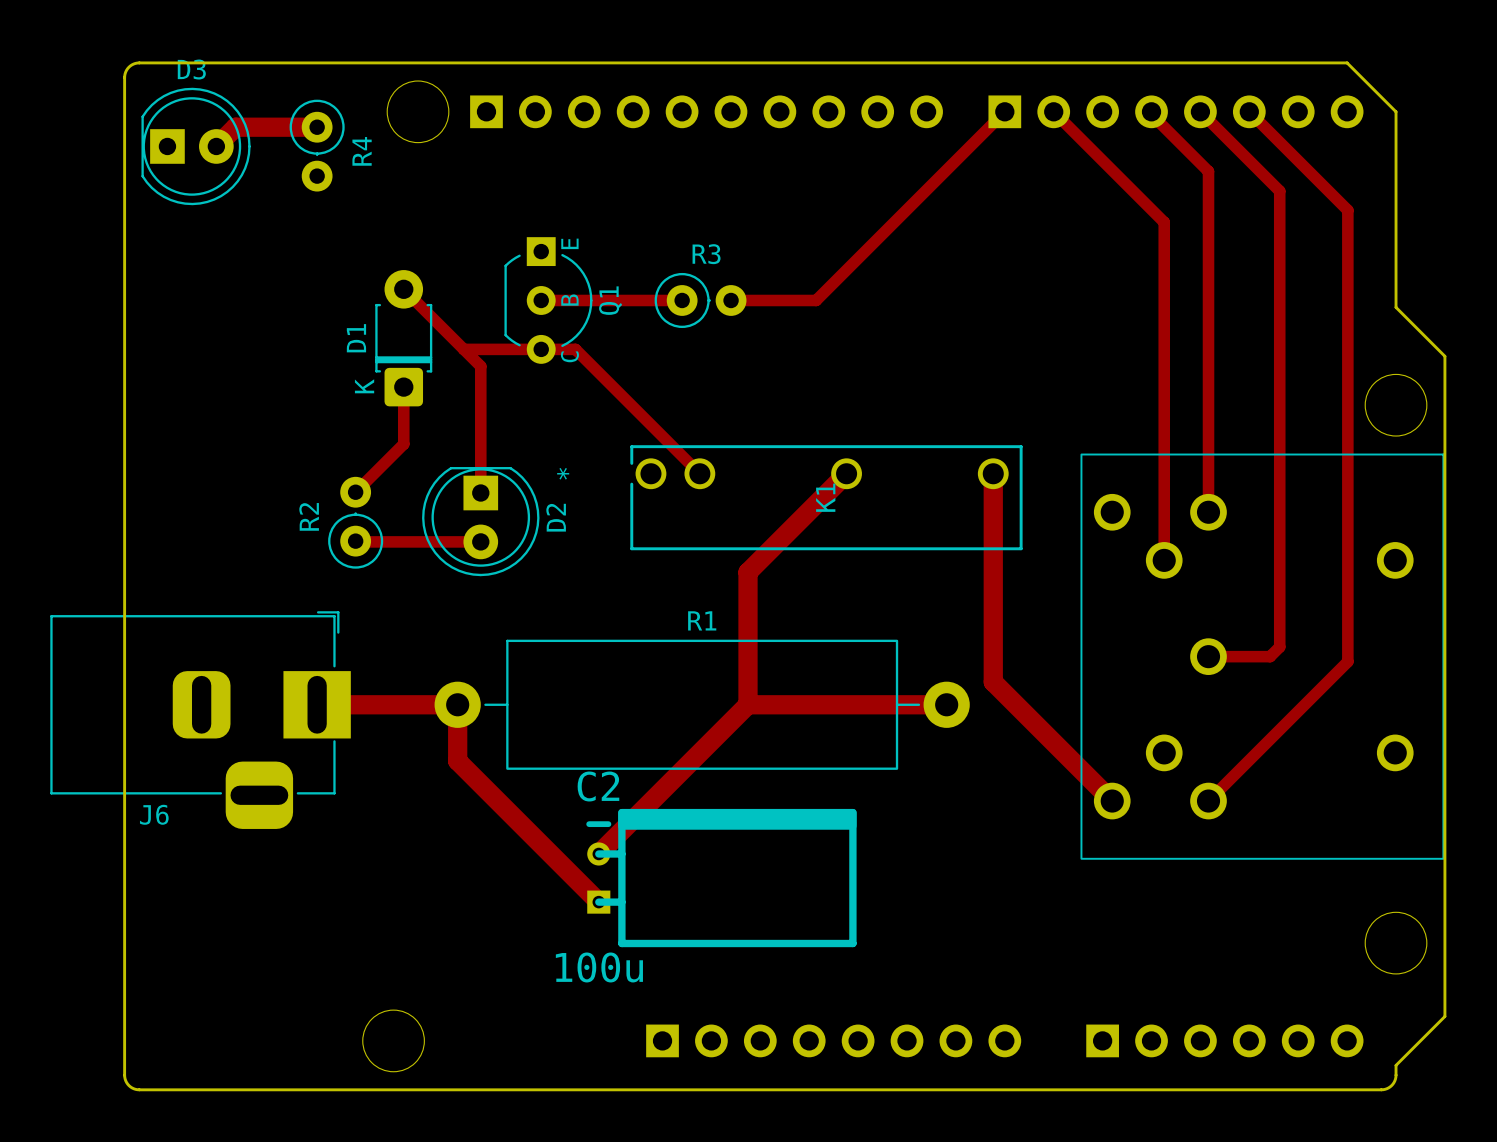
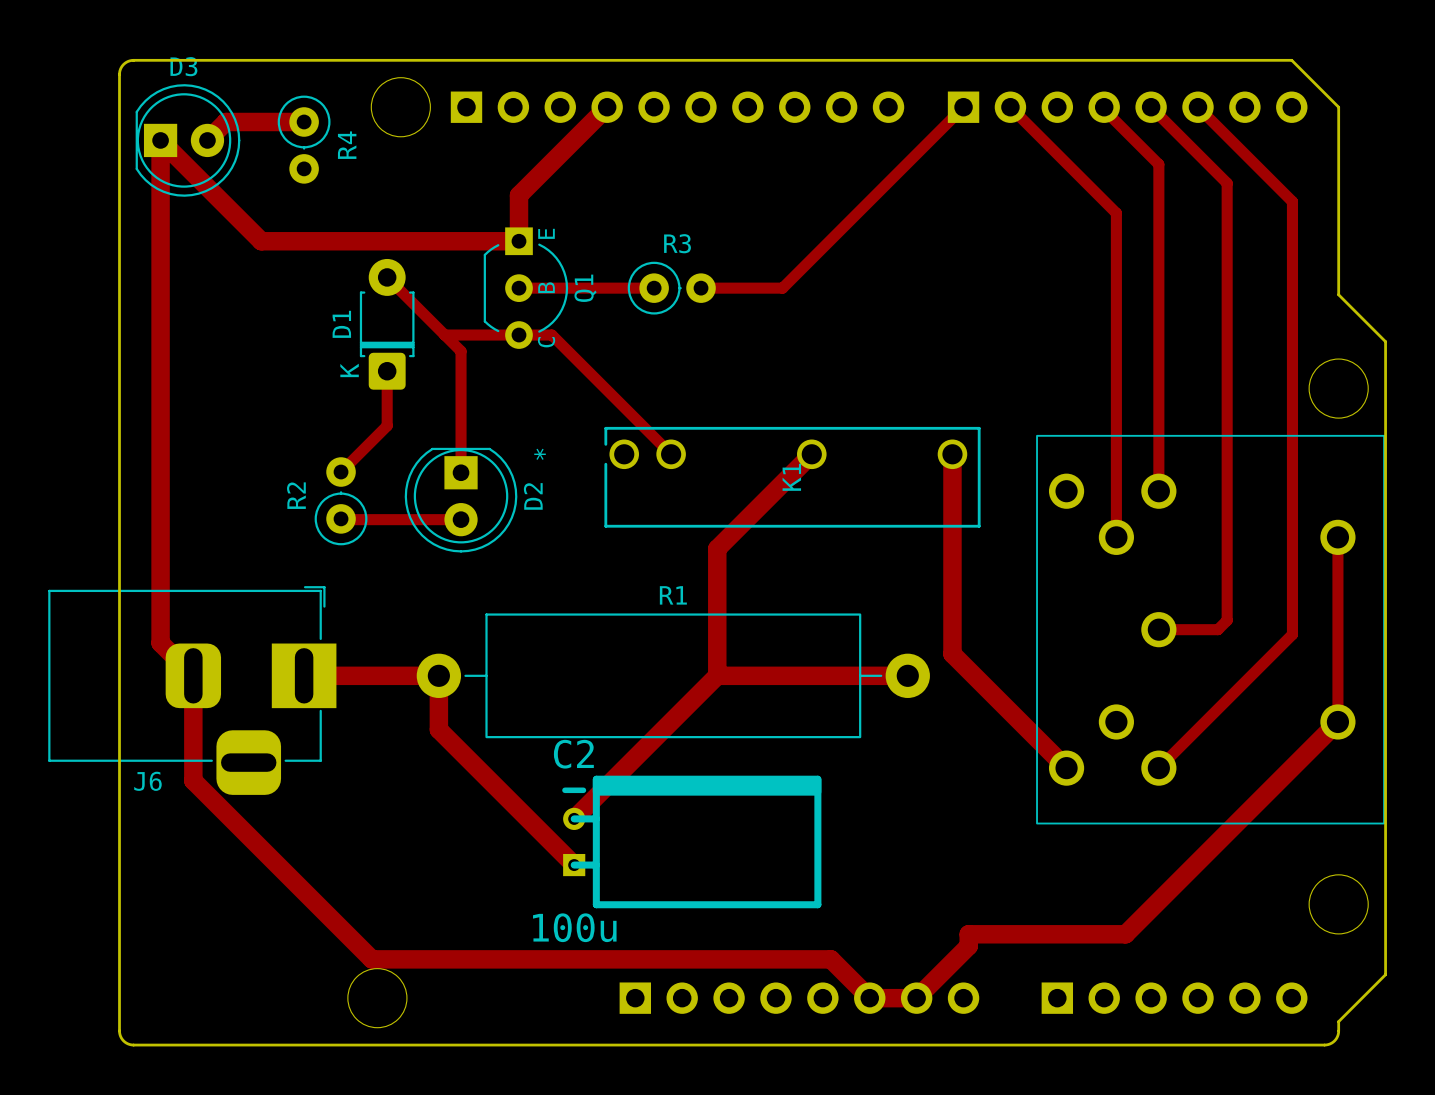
track: none -> (607, 107) (519, 195) (519, 241) (261, 241) (160, 140) (160, 643) (193, 675) (193, 780) (371, 959) (830, 959) (869, 998) (916, 998) (968, 946) (968, 934) (1125, 934) (1337, 721) (1337, 537)

